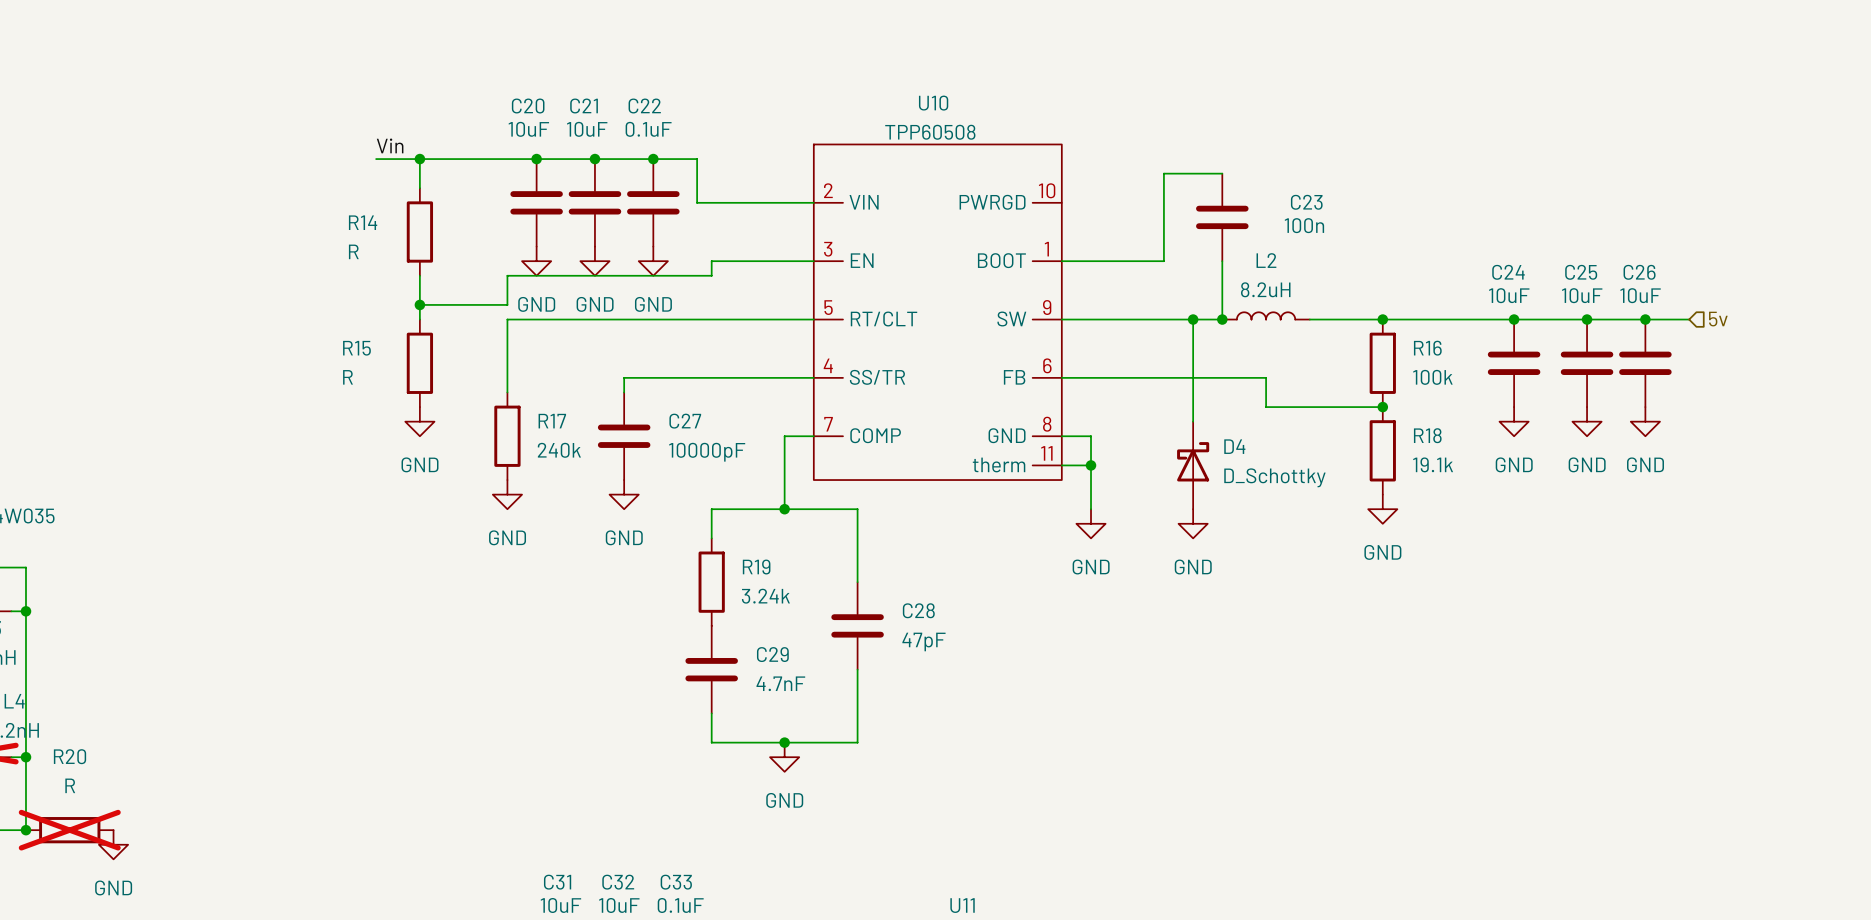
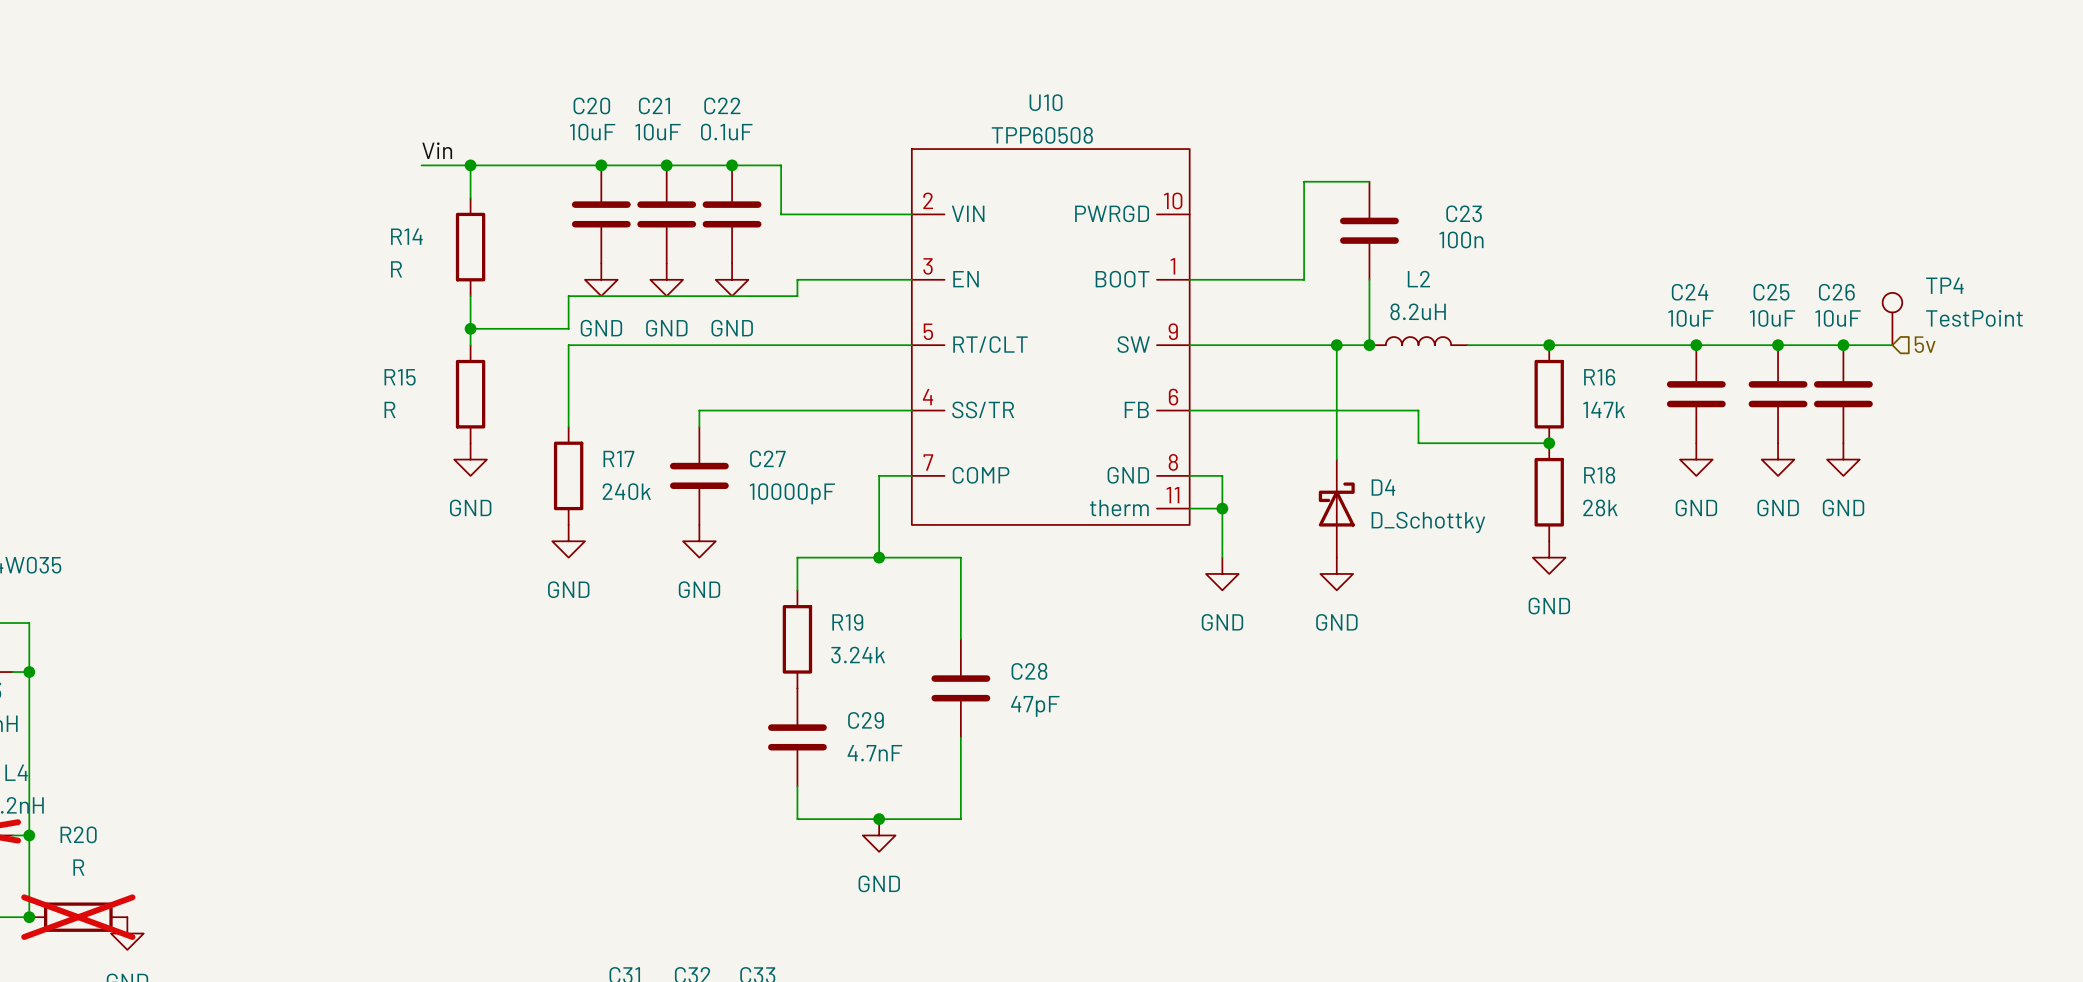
TP4: none -> TestPoint (1892, 319)
R16 value: 100k (1432, 377) -> 147k (1604, 409)
R18 value: 19.1k (1433, 464) -> 28k (1600, 507)

